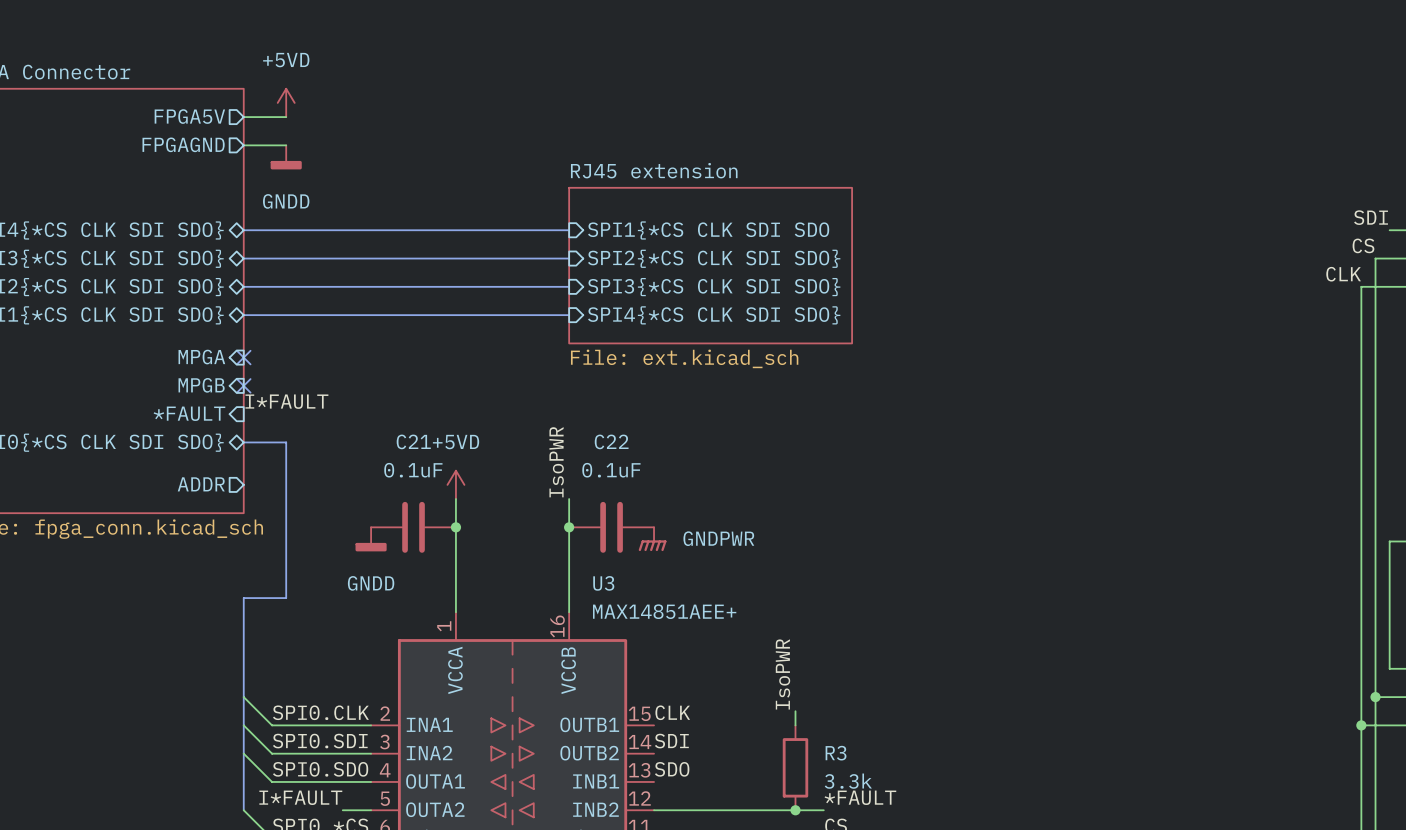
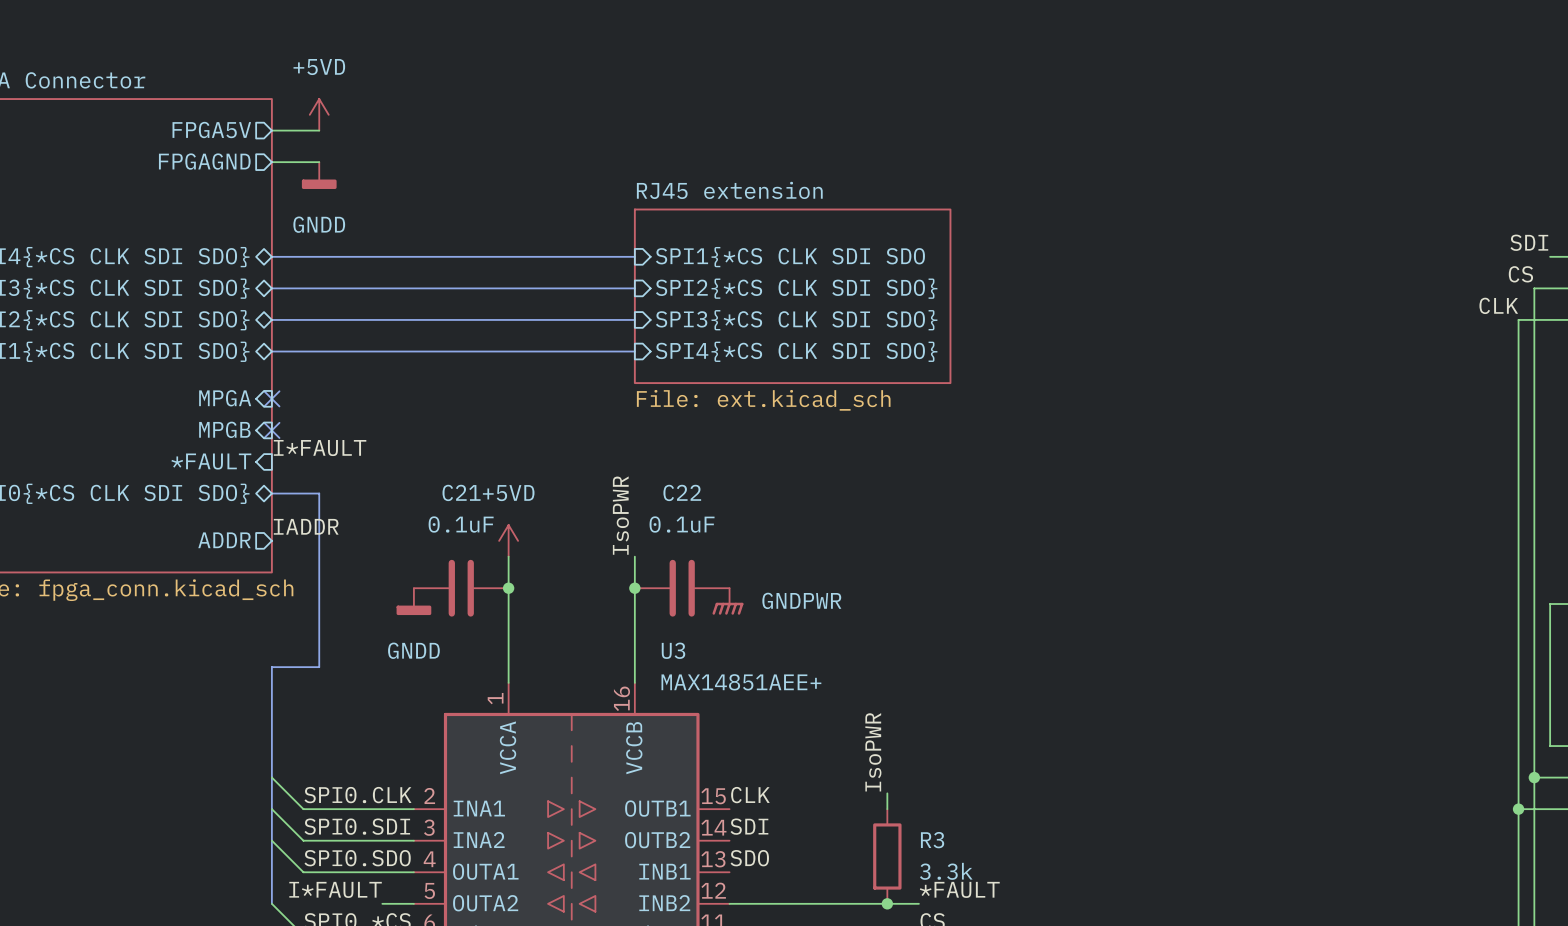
label: none -> IADDR (306, 526)

